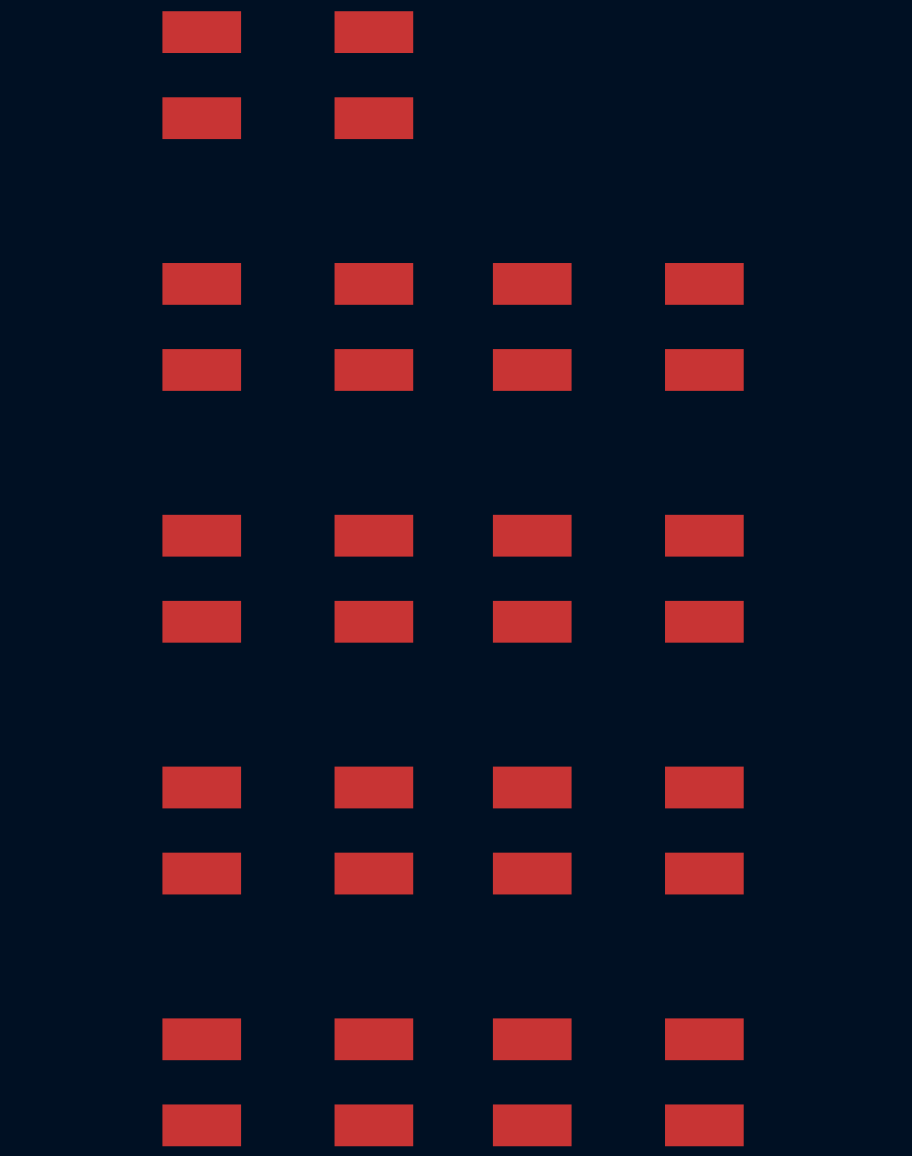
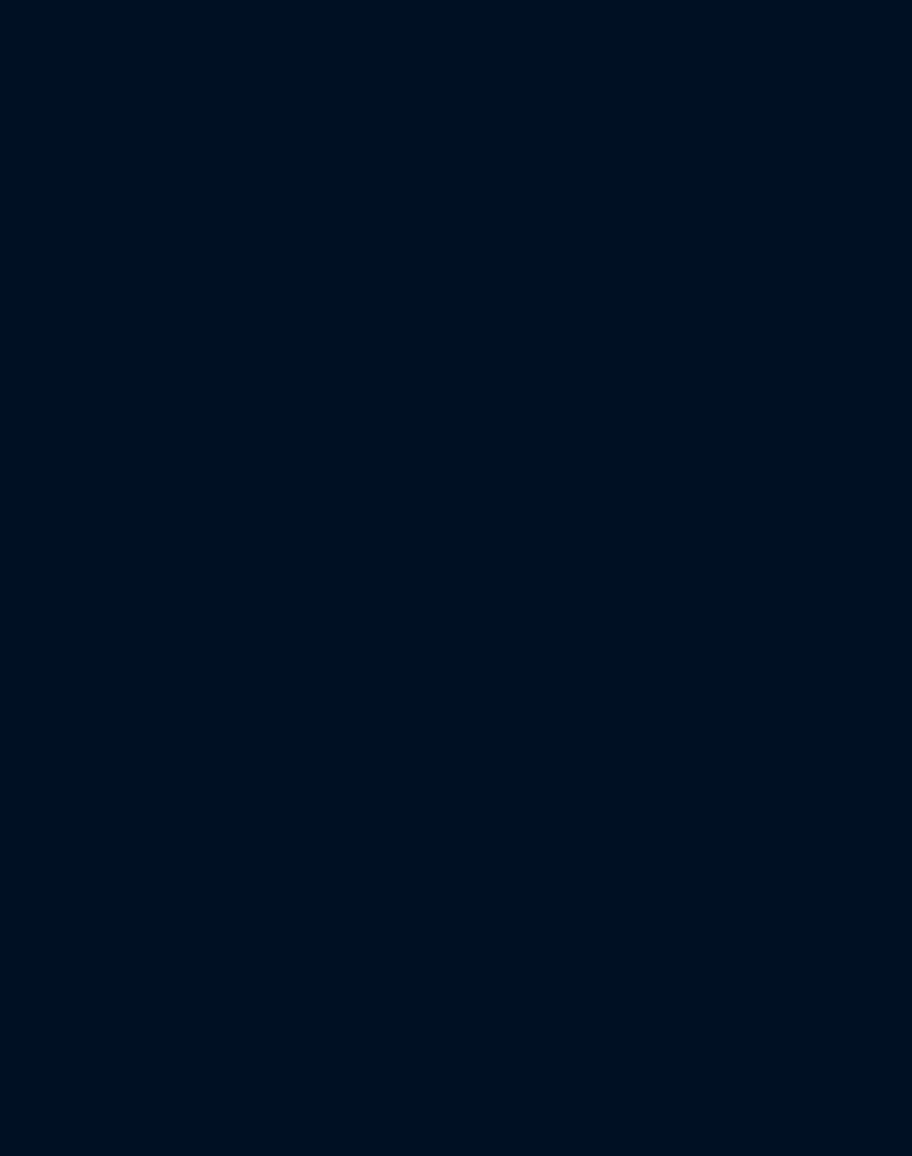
part: (287, 75) -> none
part: (287, 326) -> none
part: (618, 326) -> none
part: (287, 578) -> none
part: (618, 578) -> none
part: (287, 830) -> none
part: (618, 830) -> none
part: (287, 1082) -> none
part: (618, 1082) -> none

